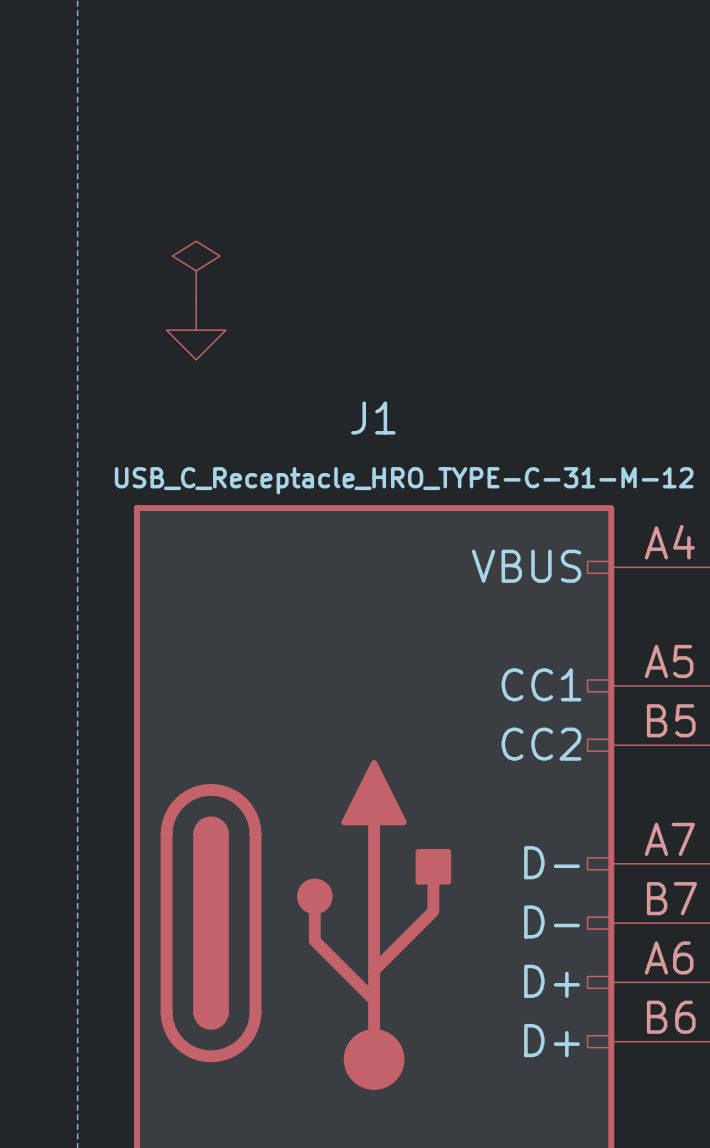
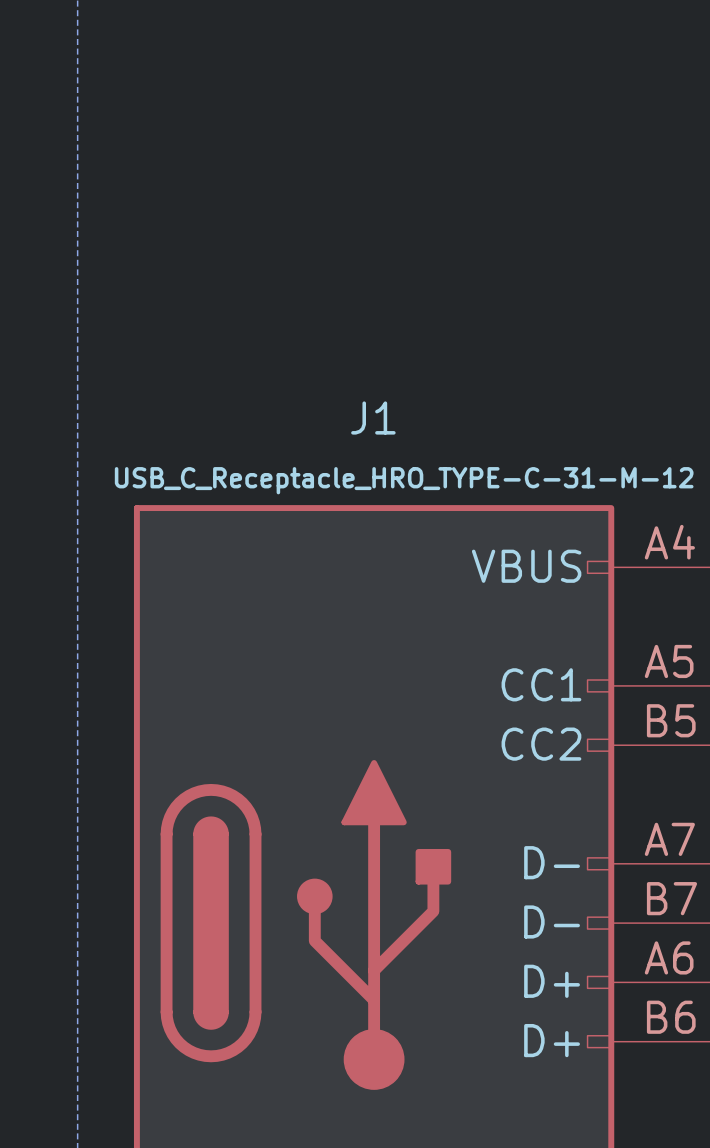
power symbol: (196, 270) -> none
power symbol: (196, 330) -> none

